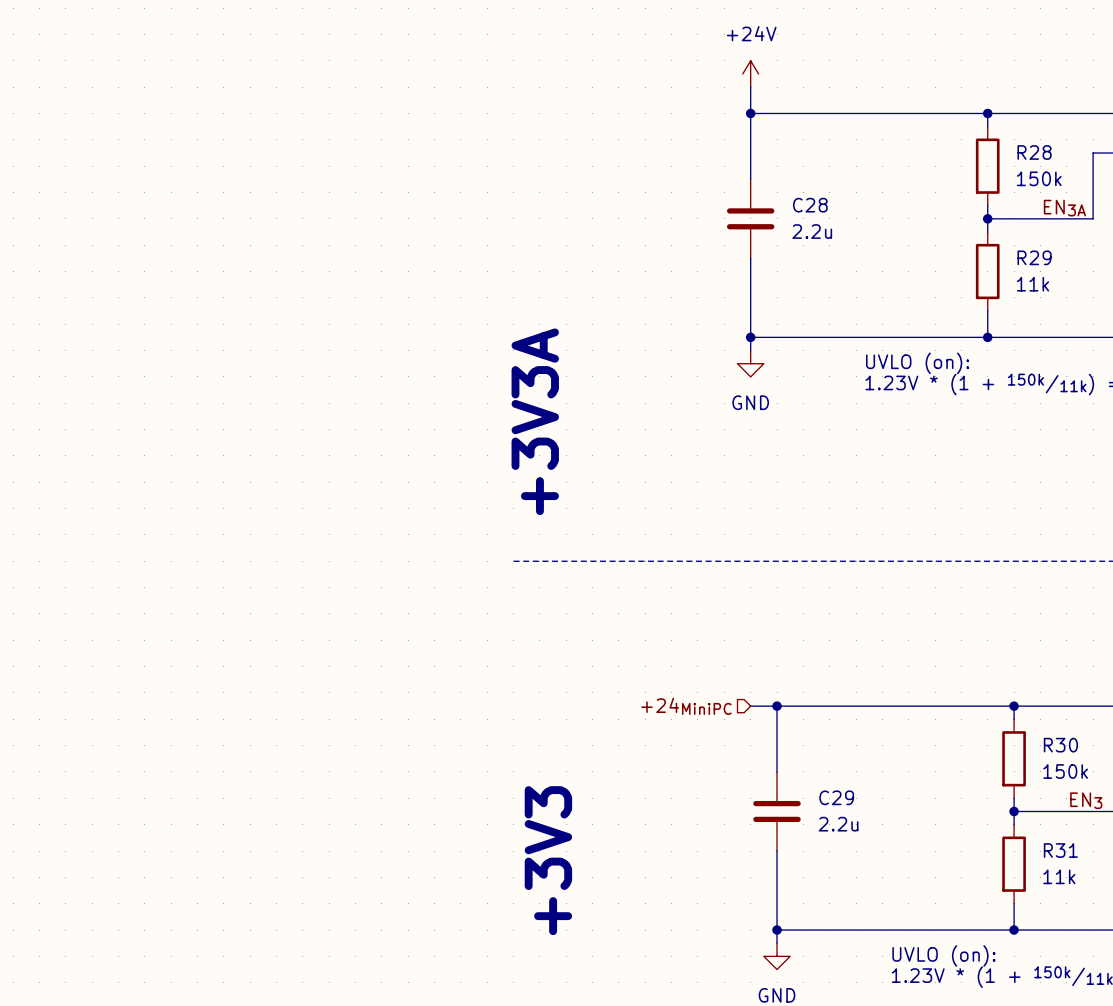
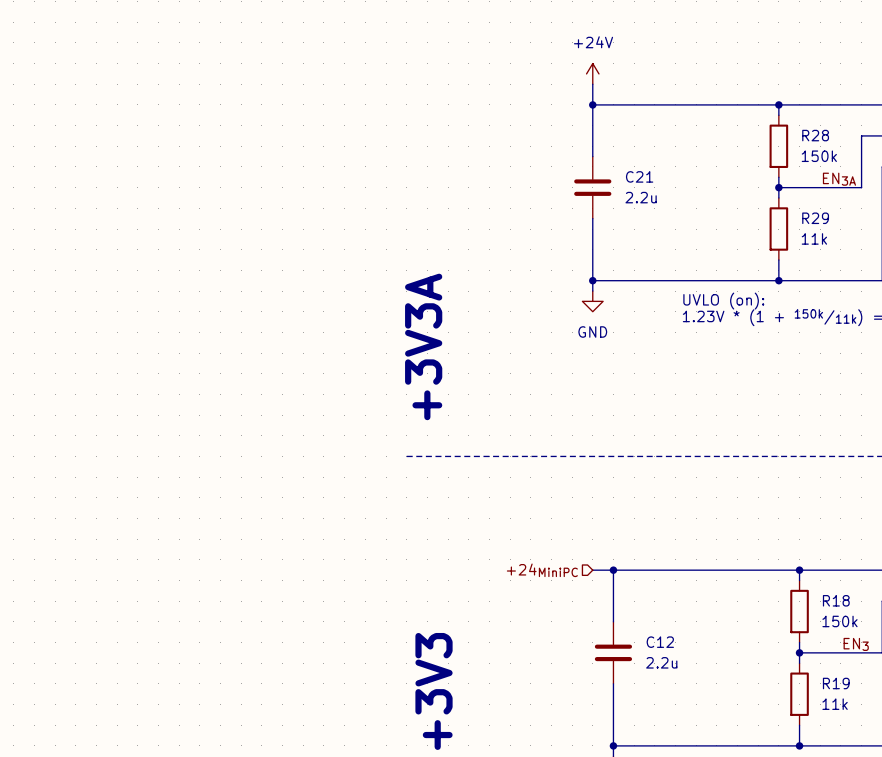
C28 name: C28 (810, 205) -> C21 (639, 176)
R30 name: R30 (1060, 745) -> R18 (836, 600)
C29 name: C29 (836, 797) -> C12 (660, 642)
R31 name: R31 (1060, 850) -> R19 (836, 683)

